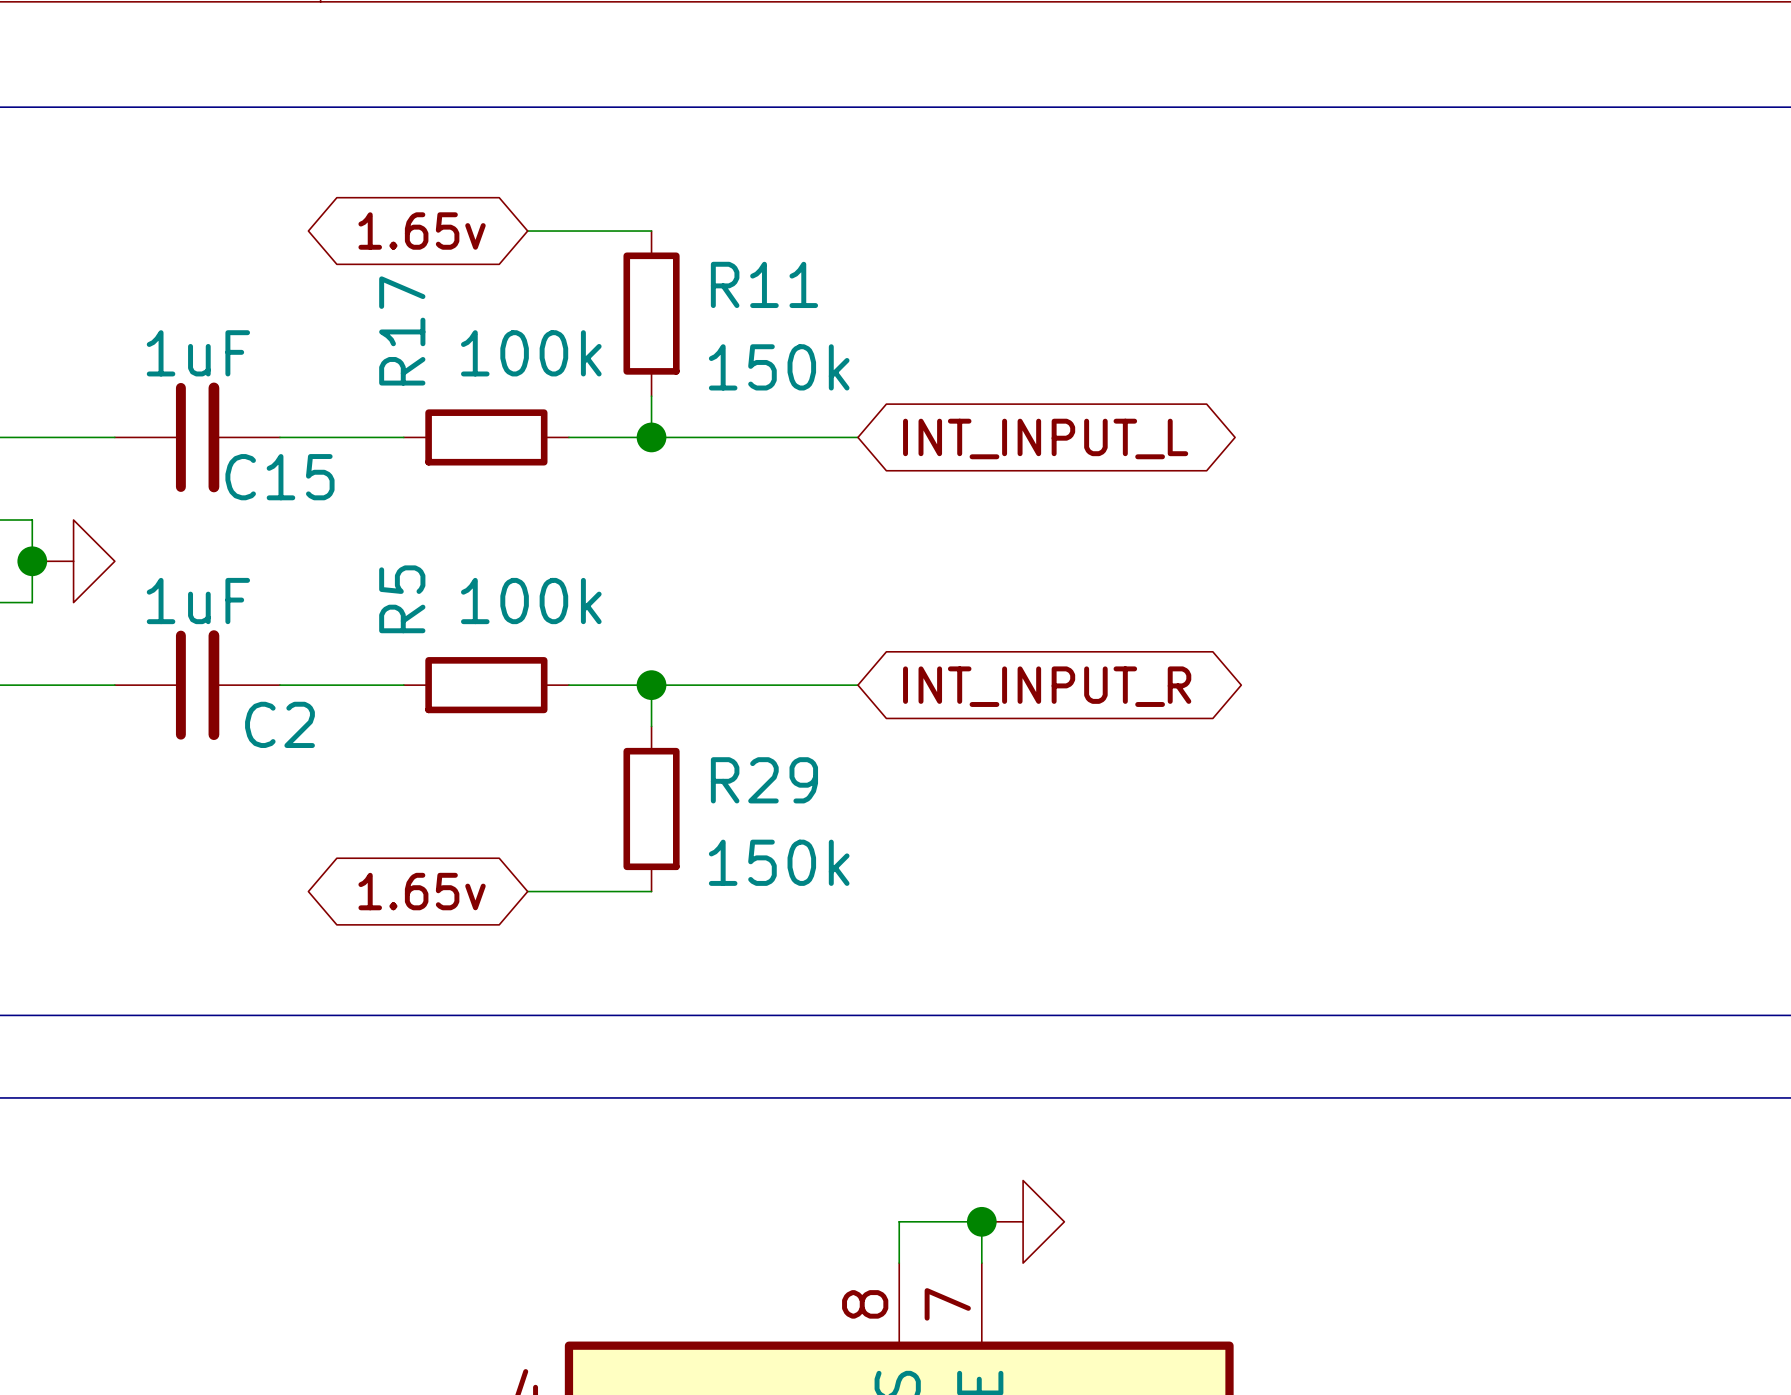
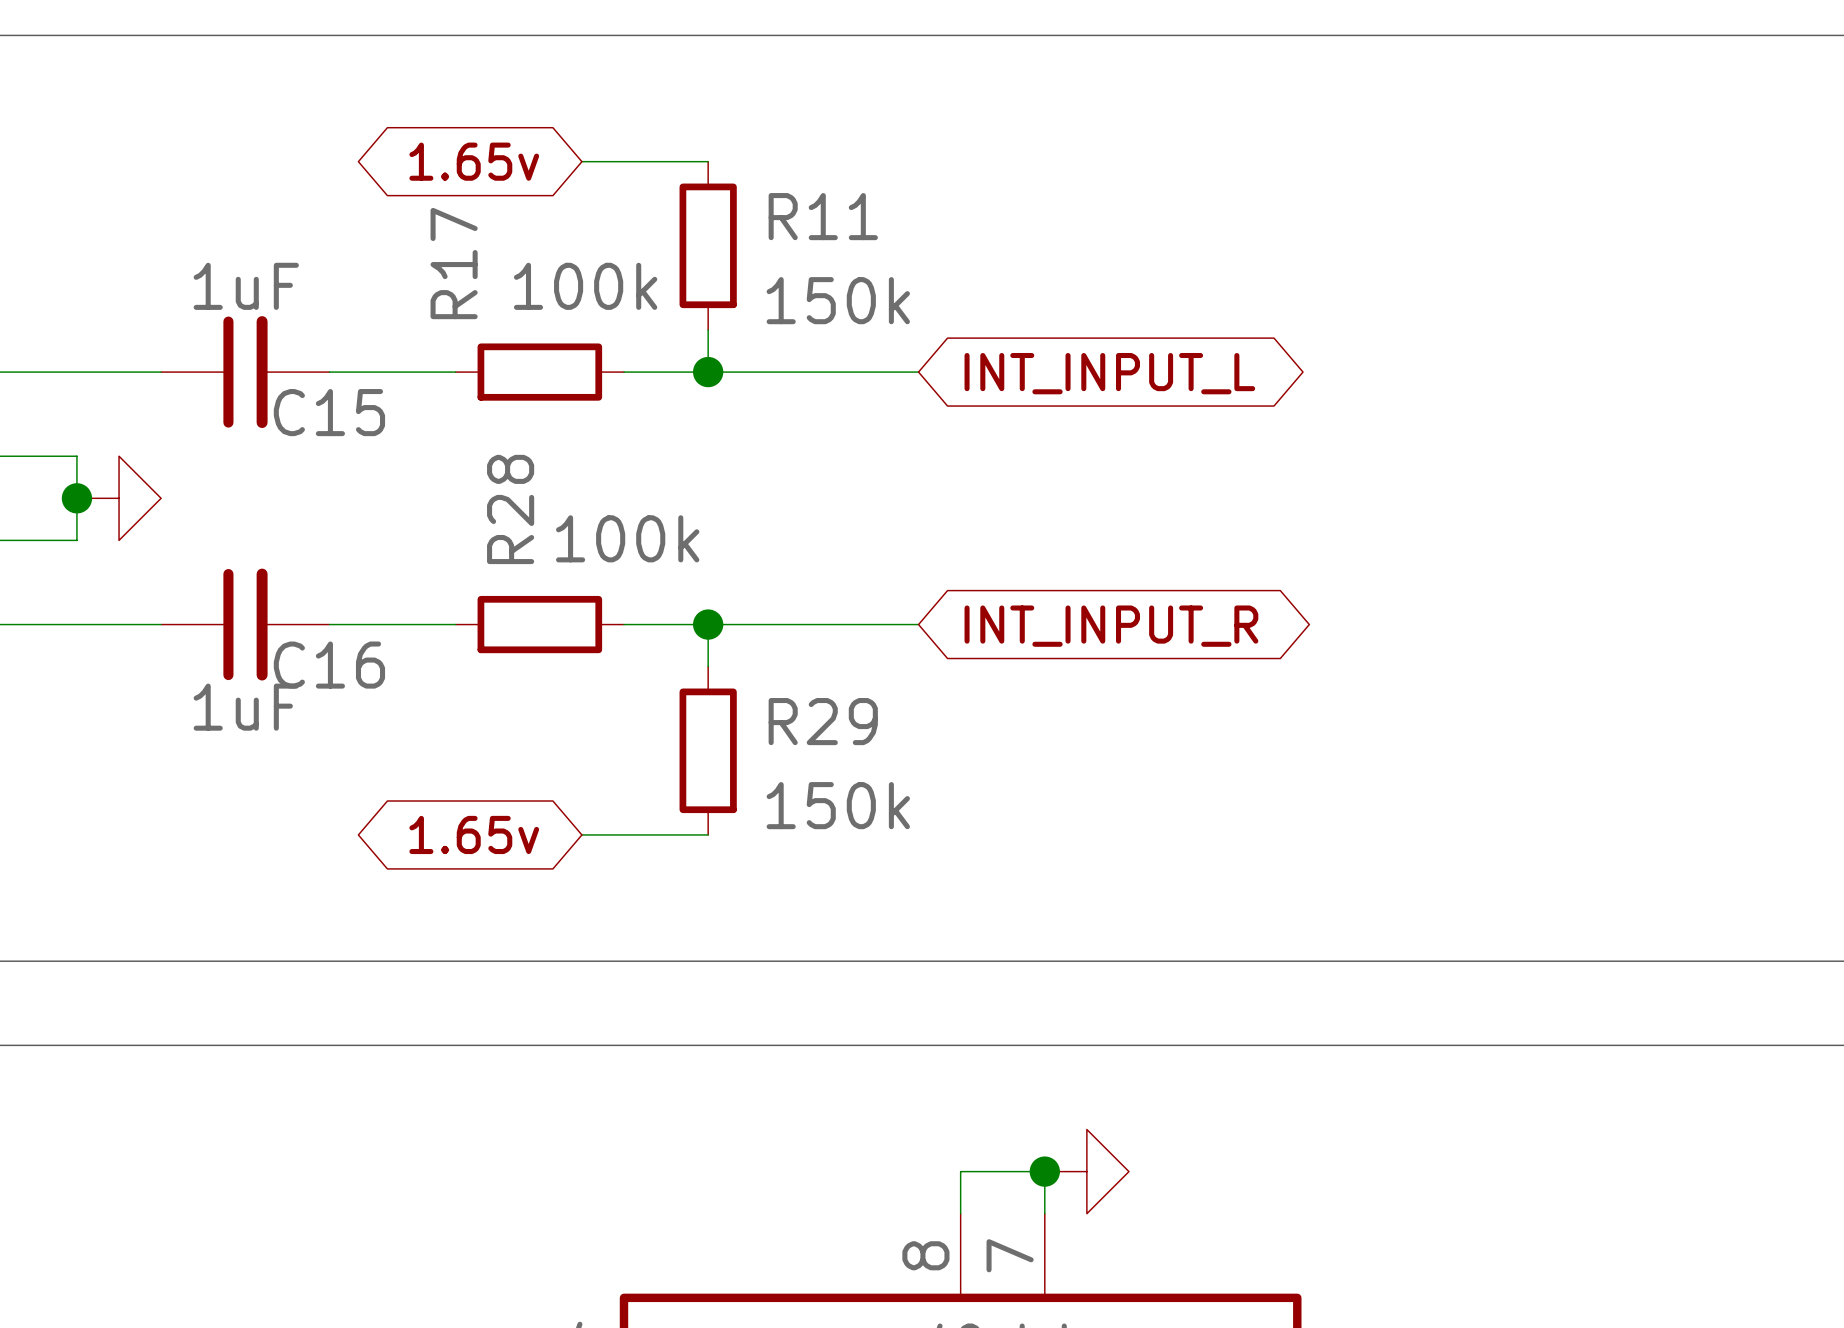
R5 name: R5 (402, 599) -> R28 (510, 509)
C2 value position: 1uF (198, 601) -> 1uF (246, 707)
R5 value position: 100k (531, 601) -> 100k (627, 538)
C2 name: C2 (279, 724) -> C16 (329, 665)

